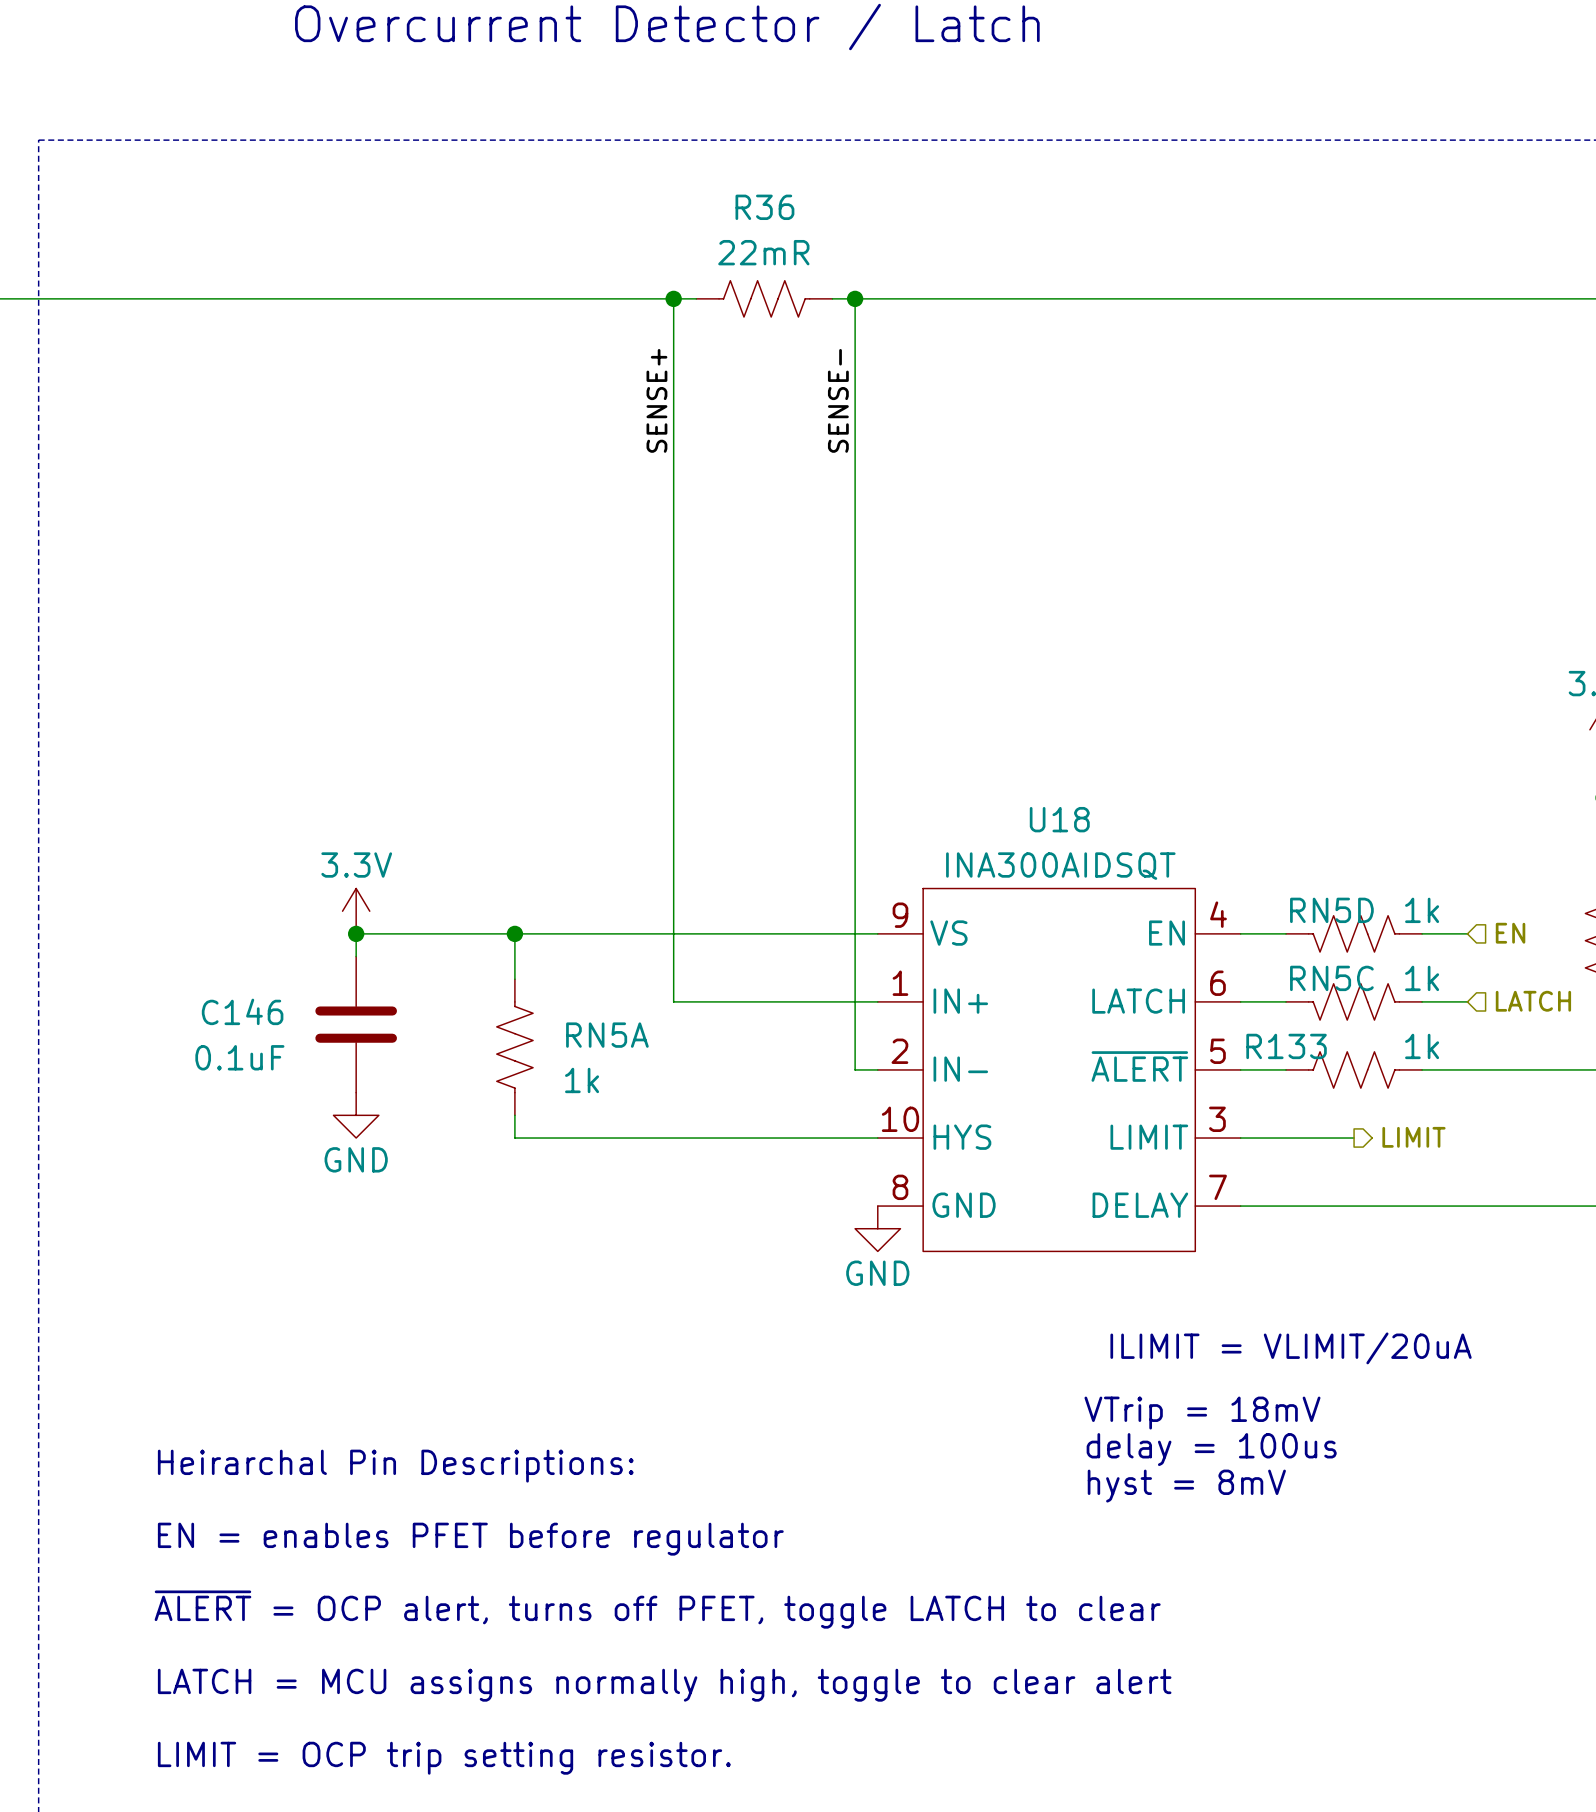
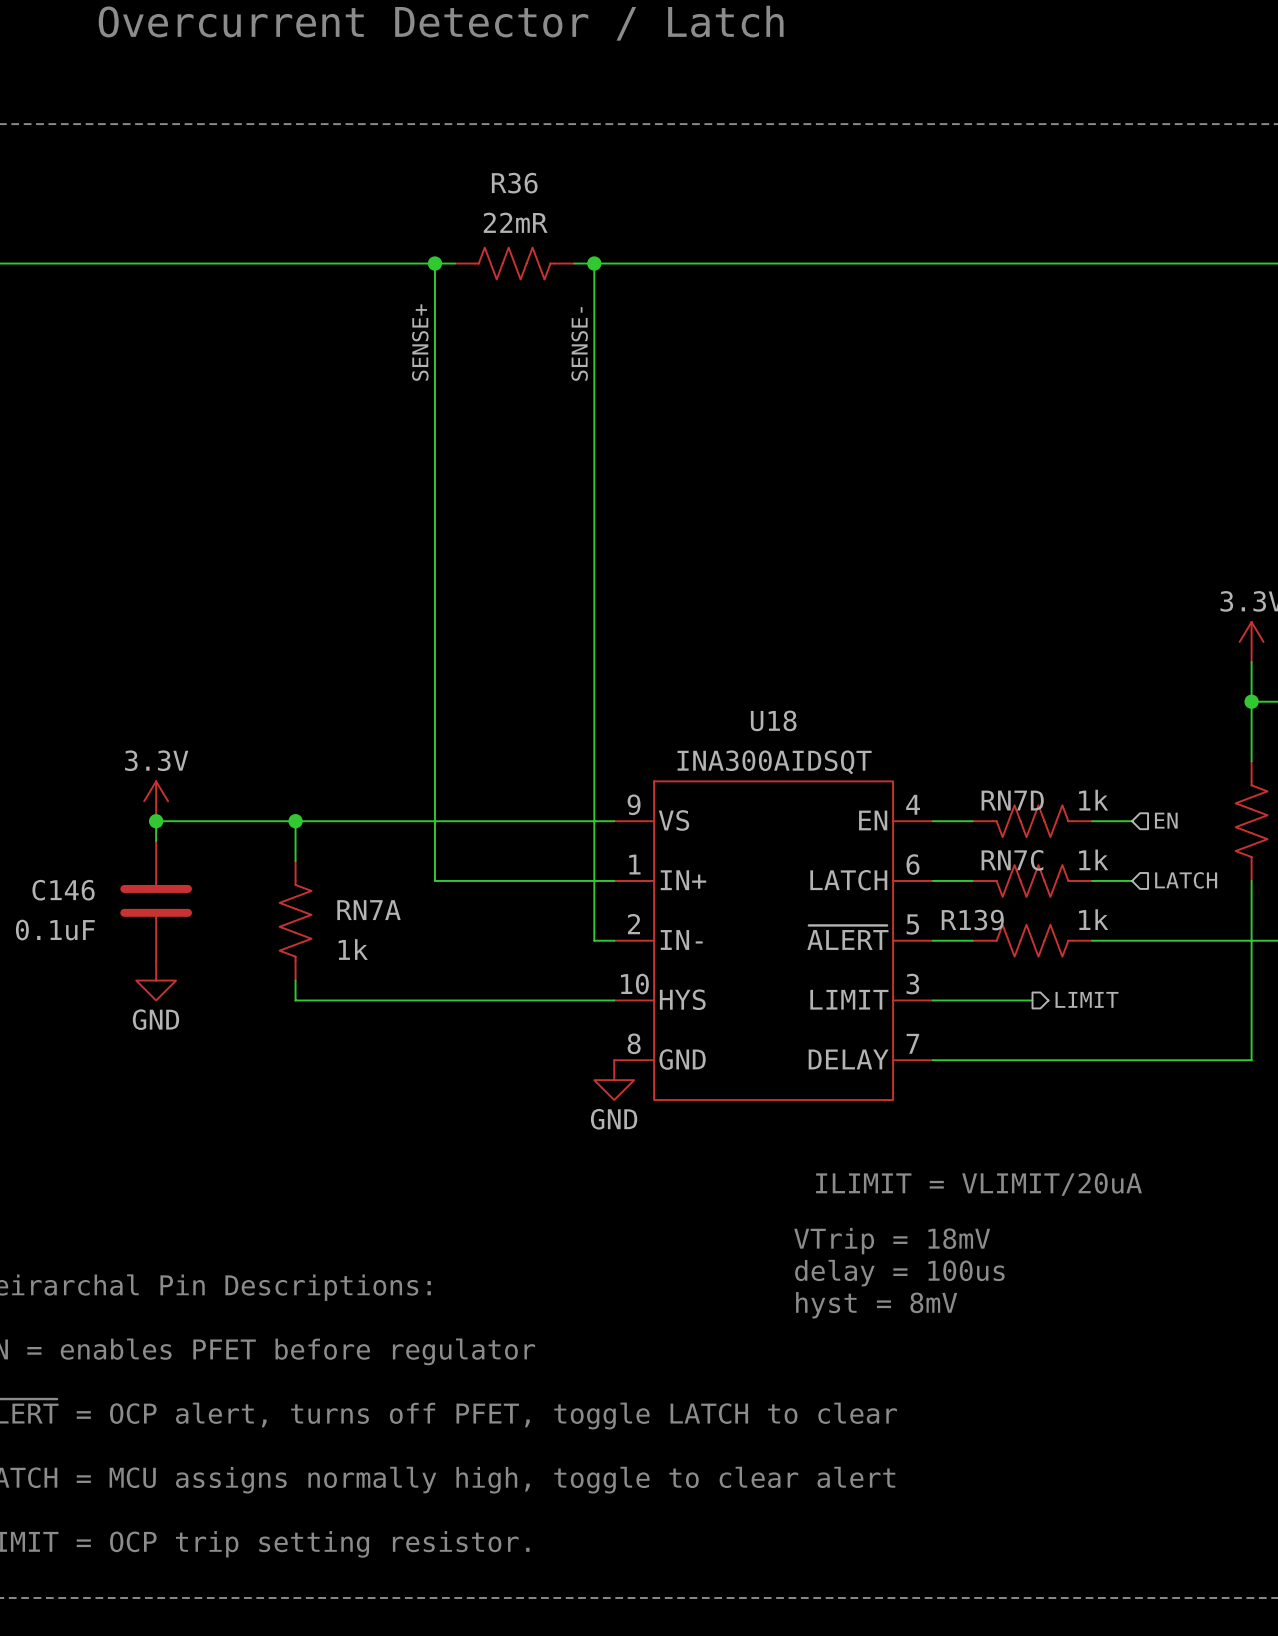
RN5D name: RN5D (1331, 910) -> RN7D (1012, 800)
RN5C name: RN5C (1331, 978) -> RN7C (1012, 860)
RN5A name: RN5A (607, 1035) -> RN7A (369, 910)
R133 name: R133 (1286, 1046) -> R139 (972, 920)

